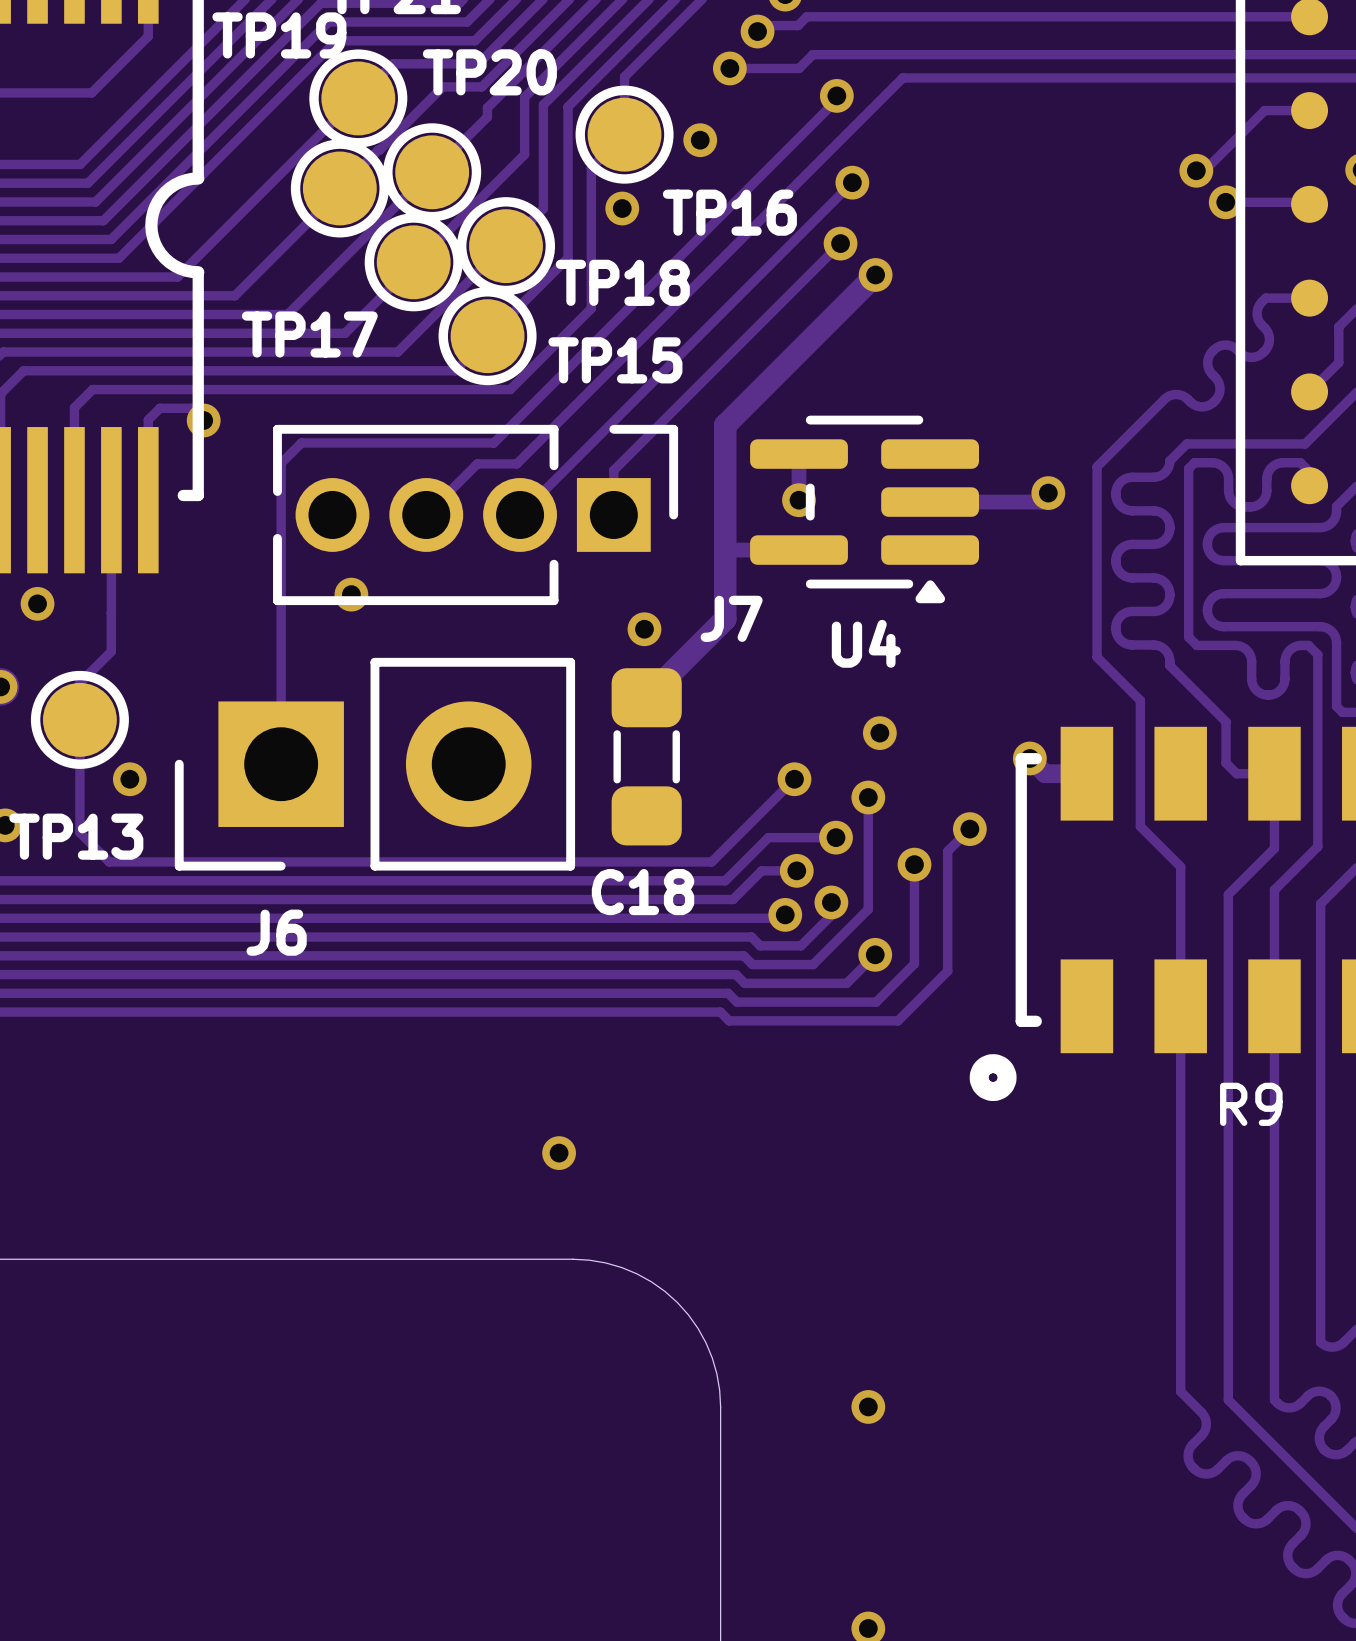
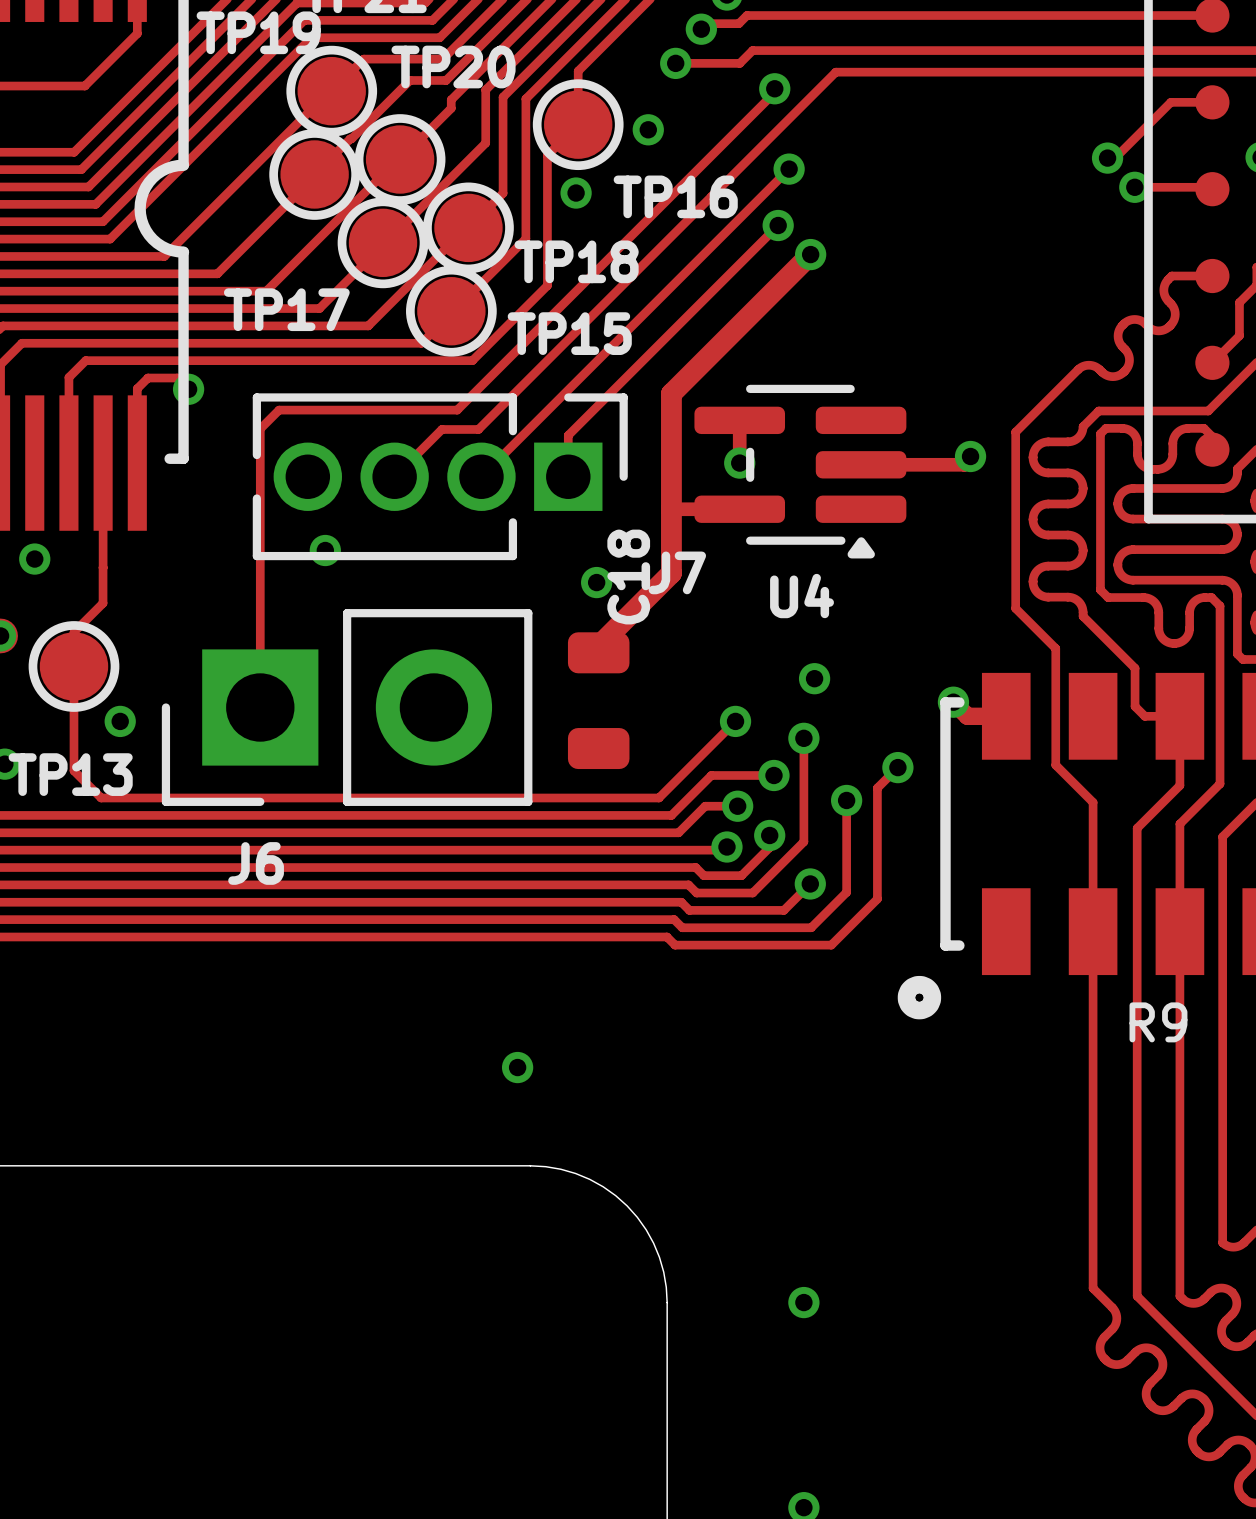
C18 footprint: [611, 668, 682, 846] -> [567, 632, 630, 770]
C18 name position: C18 (643, 892) -> C18 (628, 577)

